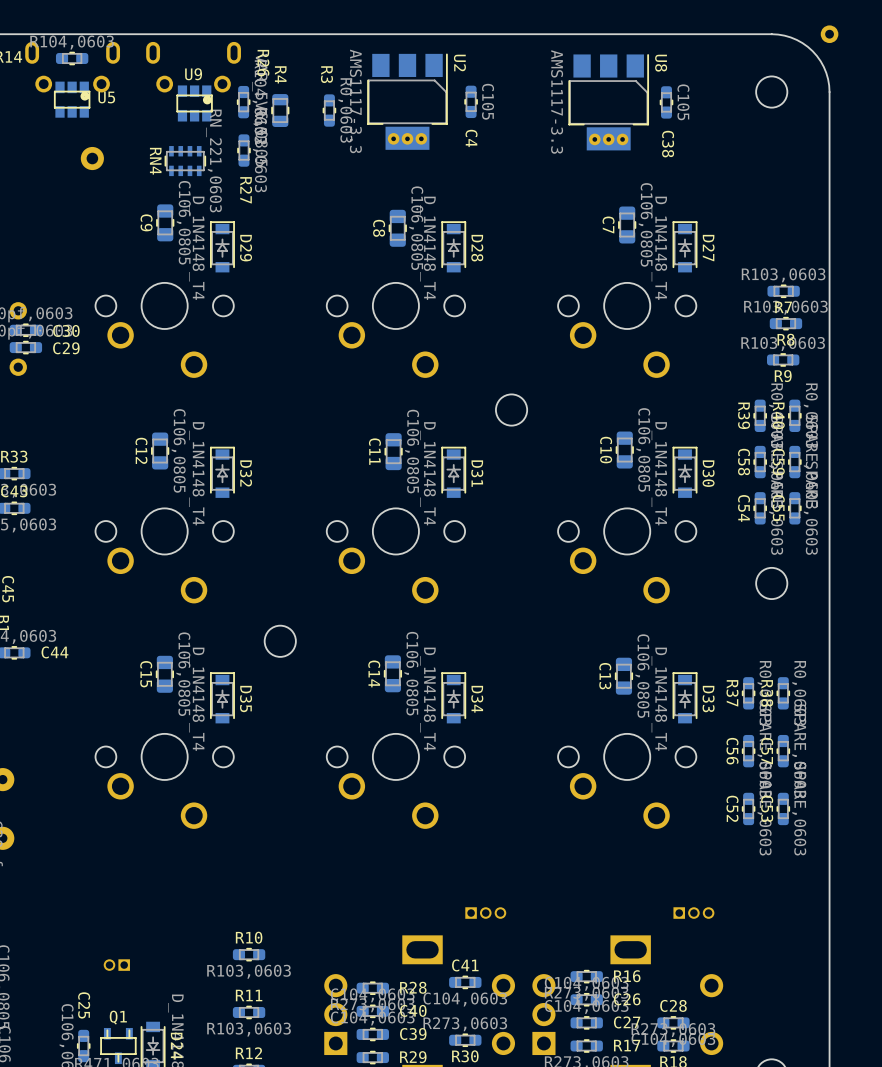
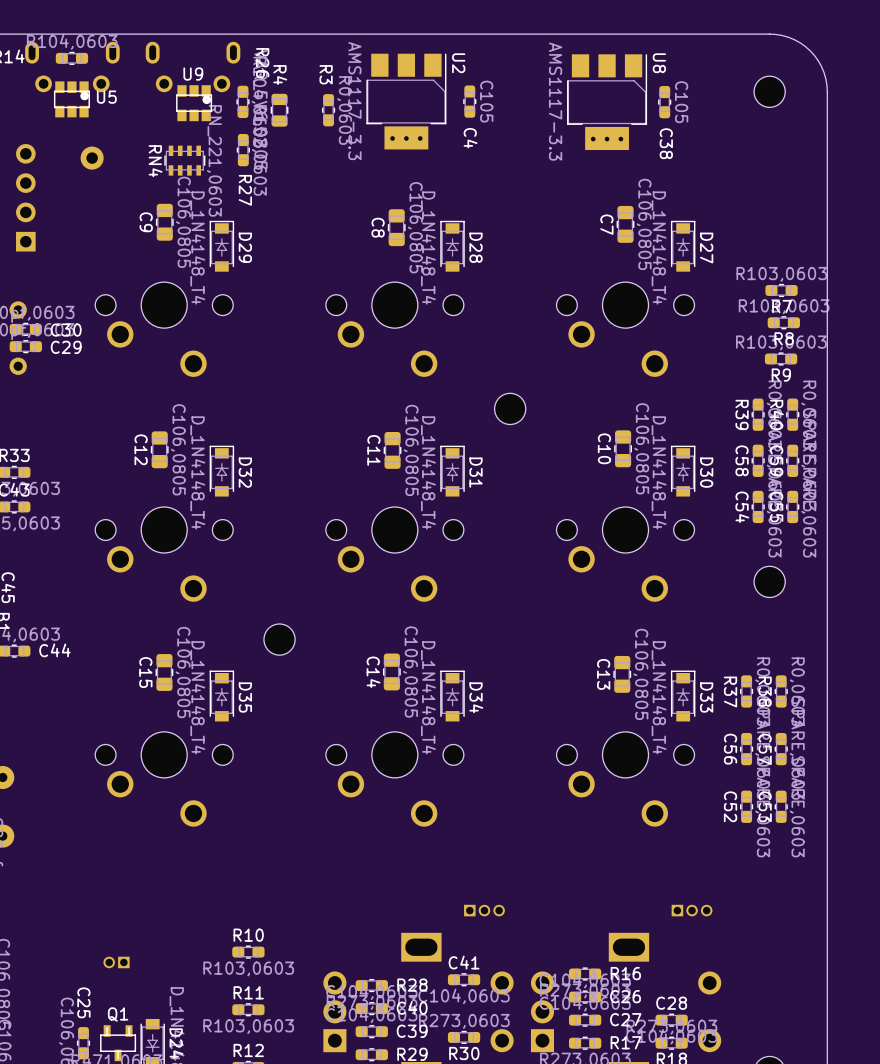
part: (829, 34) -> none
part: none -> (25, 197)

